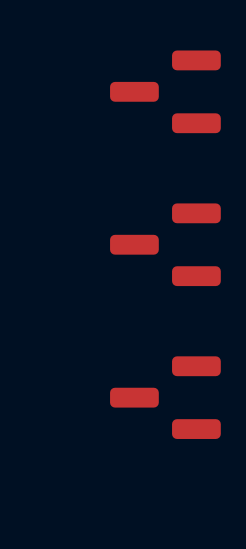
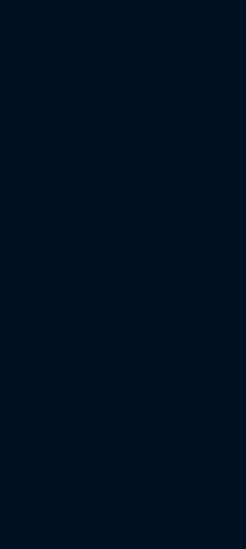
part: (165, 91) -> none
part: (165, 244) -> none
part: (165, 397) -> none

